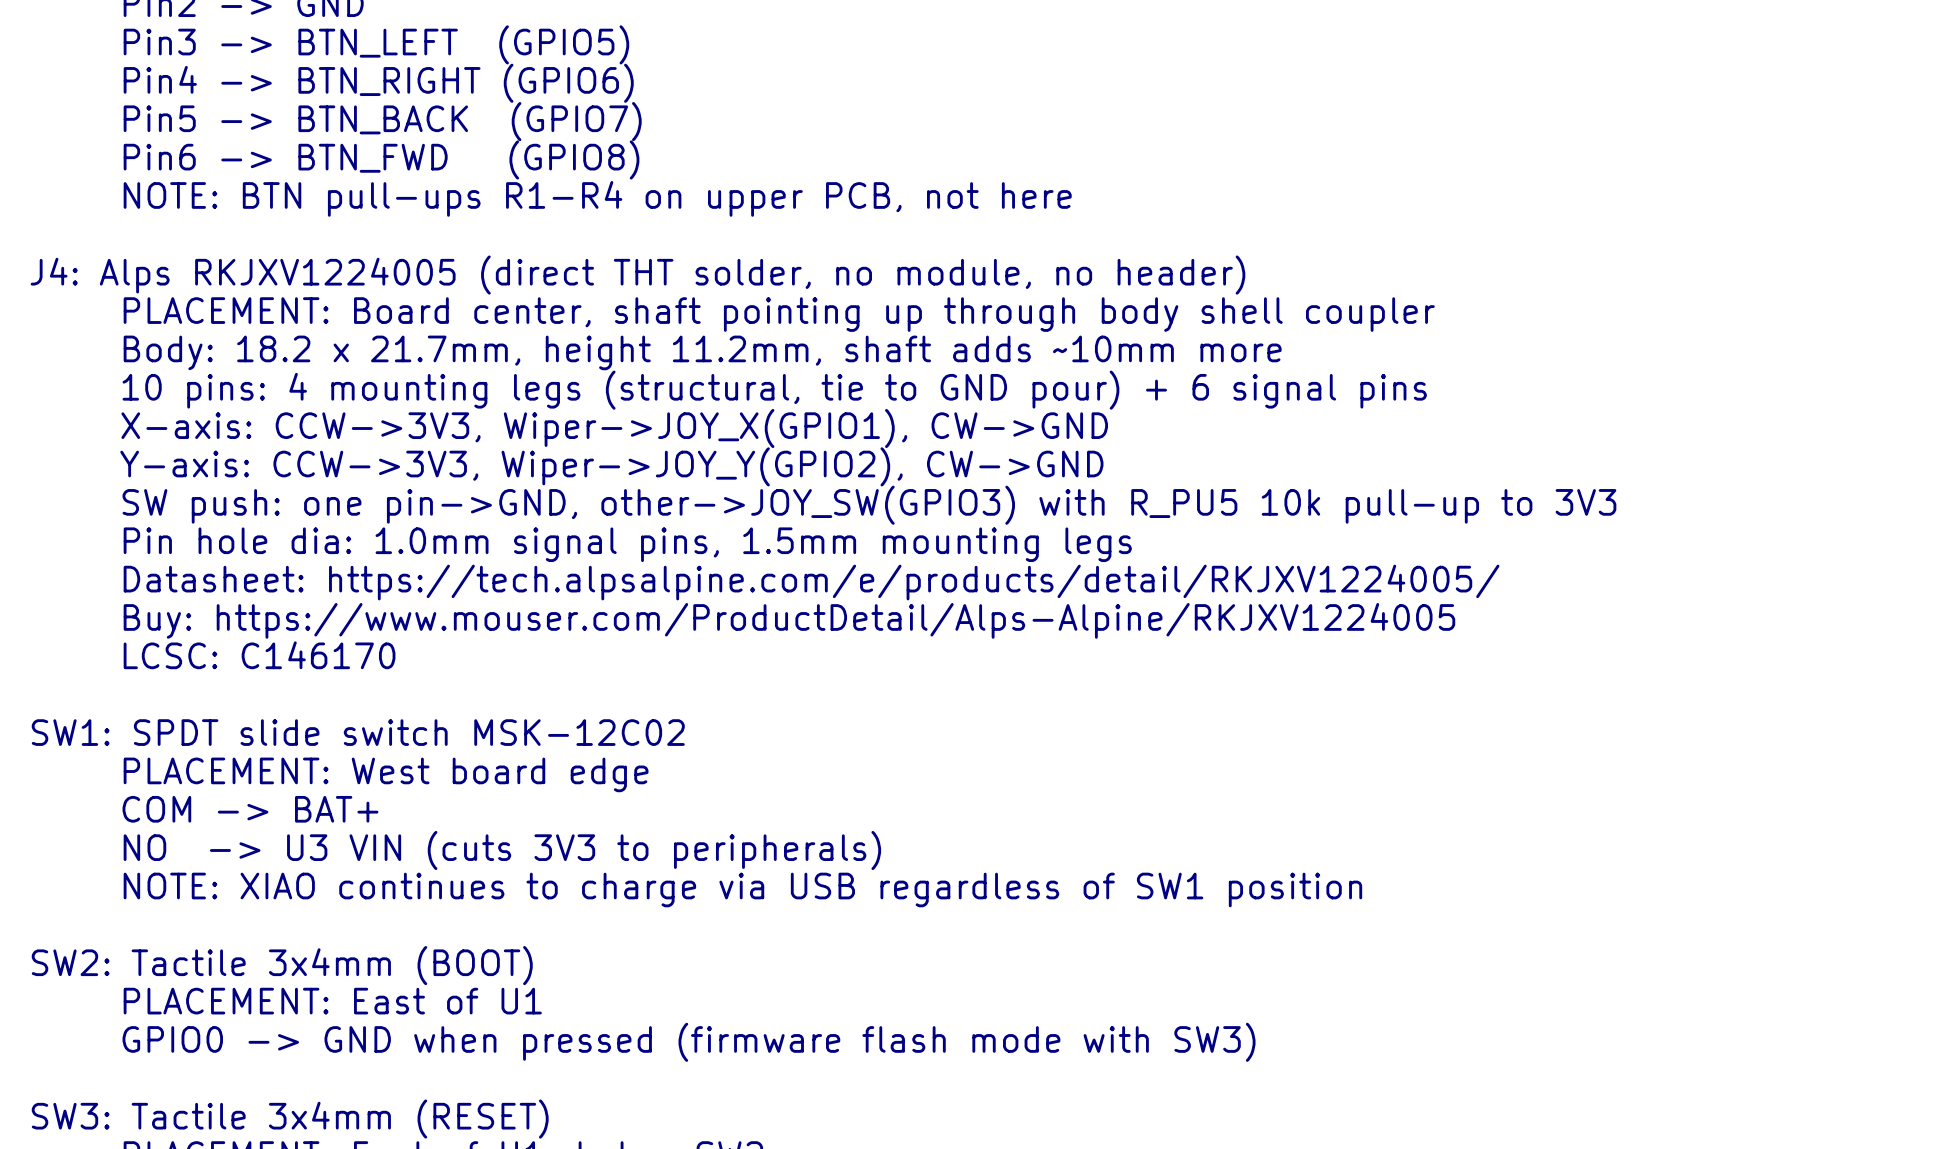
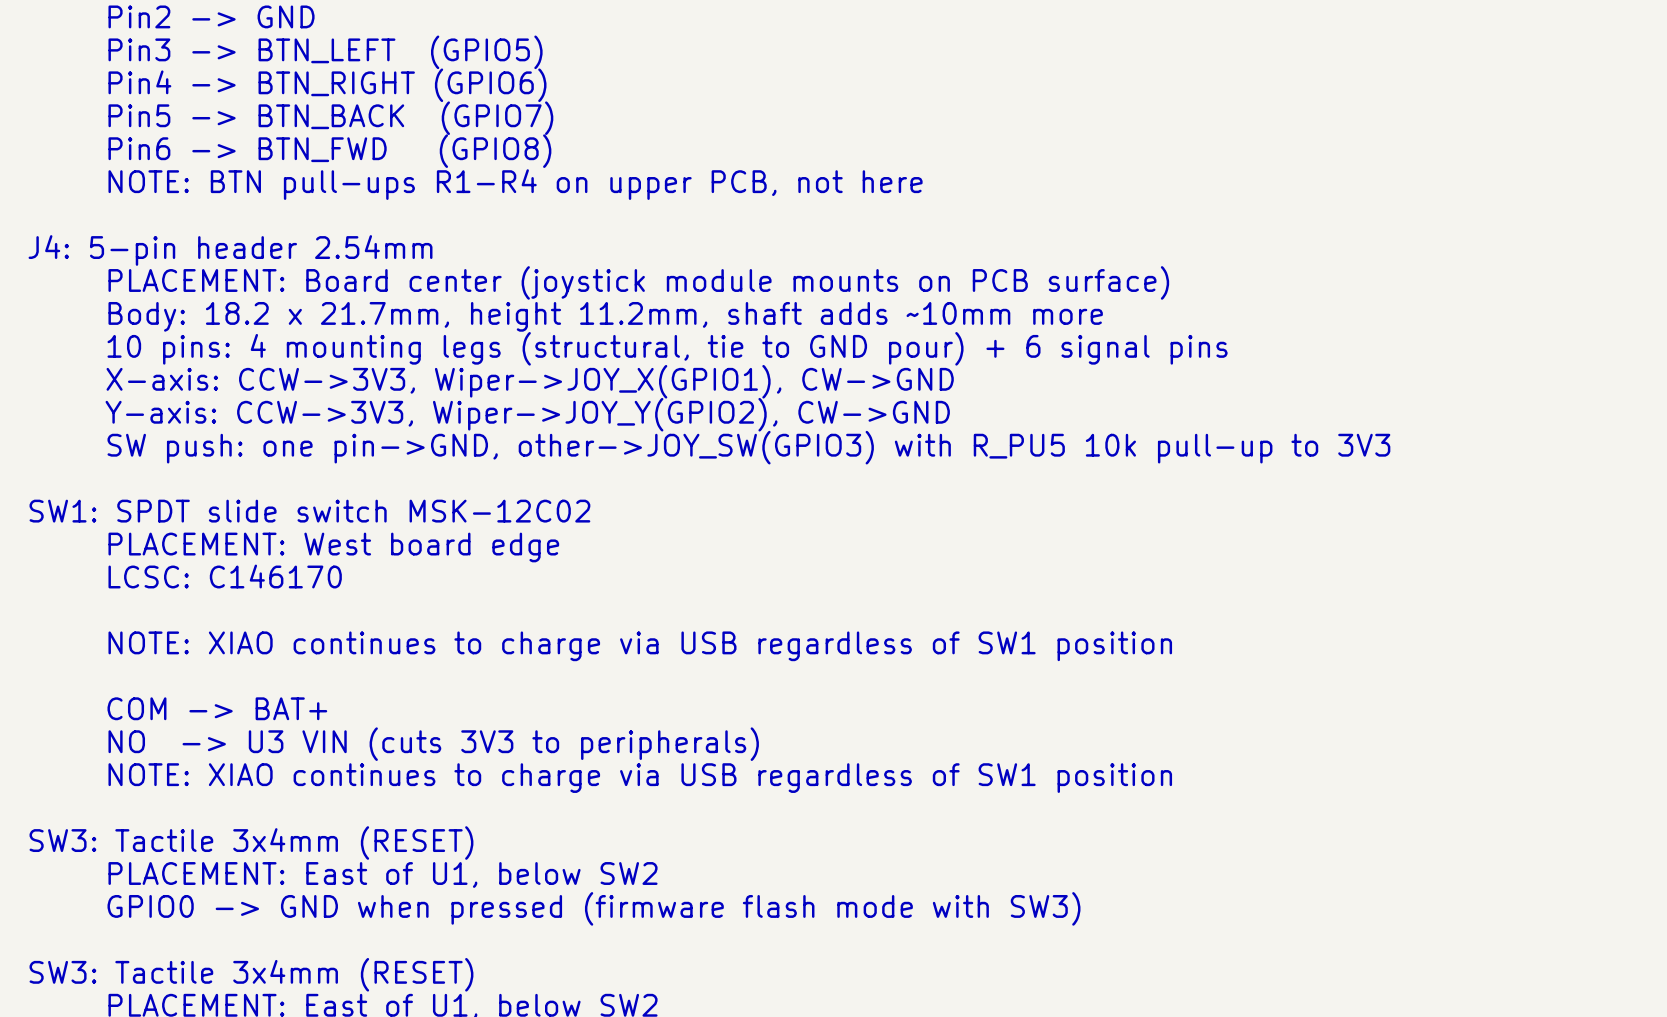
text: J4: Alps RKJXV1224005 (direct THT solder, no module, no header) (637, 275) -> J4: 5-pin header 2.54mm (230, 250)
text: PLACEMENT: Board center, shaft pointing up through body shell coupler (779, 314) -> PLACEMENT: Board center (joystick module mounts on PCB surface) (638, 282)
text: Pin hole dia: 1.0mm signal pins, 1.5mm mounting legs (627, 544) -> none
text: Datasheet: https://tech.alpsalpine.com/e/products/detail/RKJXV1224005/ (811, 582) -> SW1: SPDT slide switch MSK-12C02 (309, 511)
text: Buy: https://www.mouser.com/ProductDetail/Alps-Alpine/RKJXV1224005 (789, 620) -> PLACEMENT: West board edge (333, 547)
text: SW1: SPDT slide switch MSK-12C02 (358, 732) -> NOTE: XIAO continues to charge via USB regardless of SW1 position (640, 646)
text: PLACEMENT: West board edge (386, 774) -> none
text: SW2: Tactile 3x4mm (BOOT) (282, 965) -> SW3: Tactile 3x4mm (RESET) (251, 842)
text: PLACEMENT: East of U1 (332, 1001) -> PLACEMENT: East of U1, below SW2 (383, 874)

